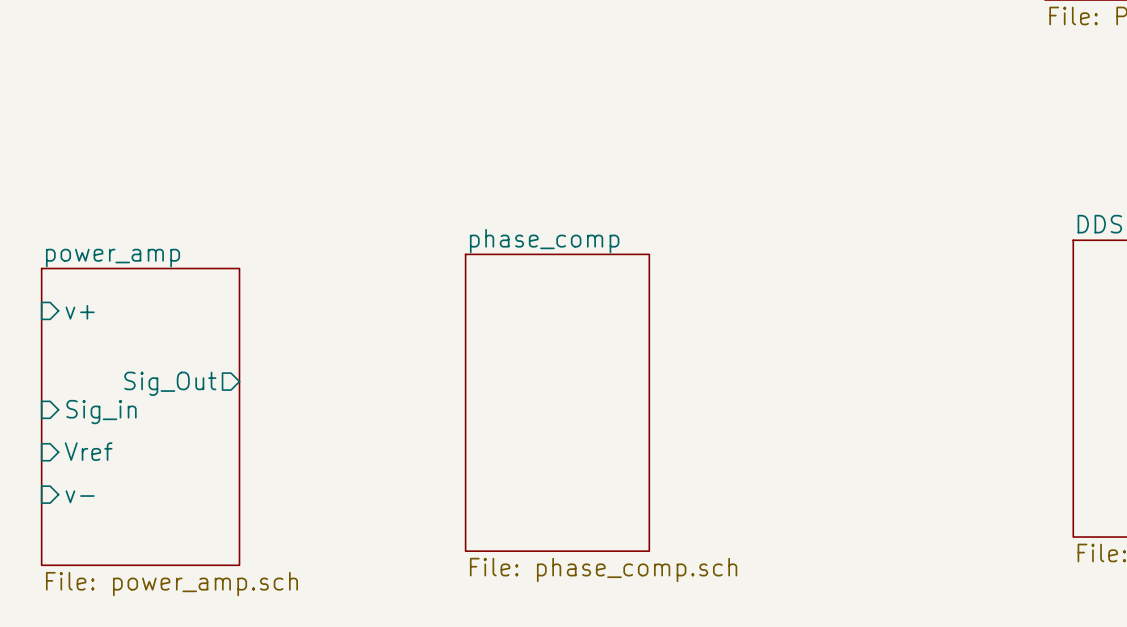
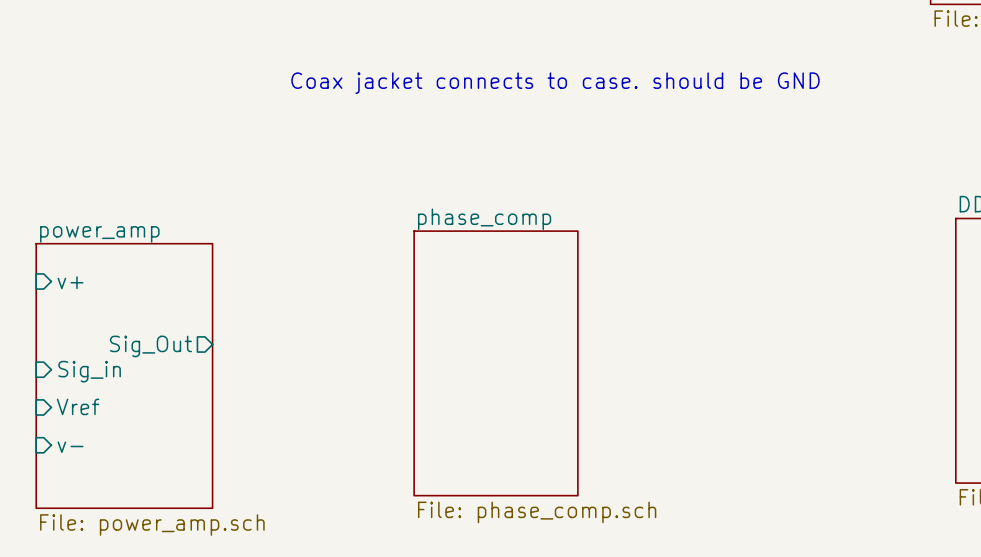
text: none -> Coax jacket connects to case. should be GND (555, 83)

